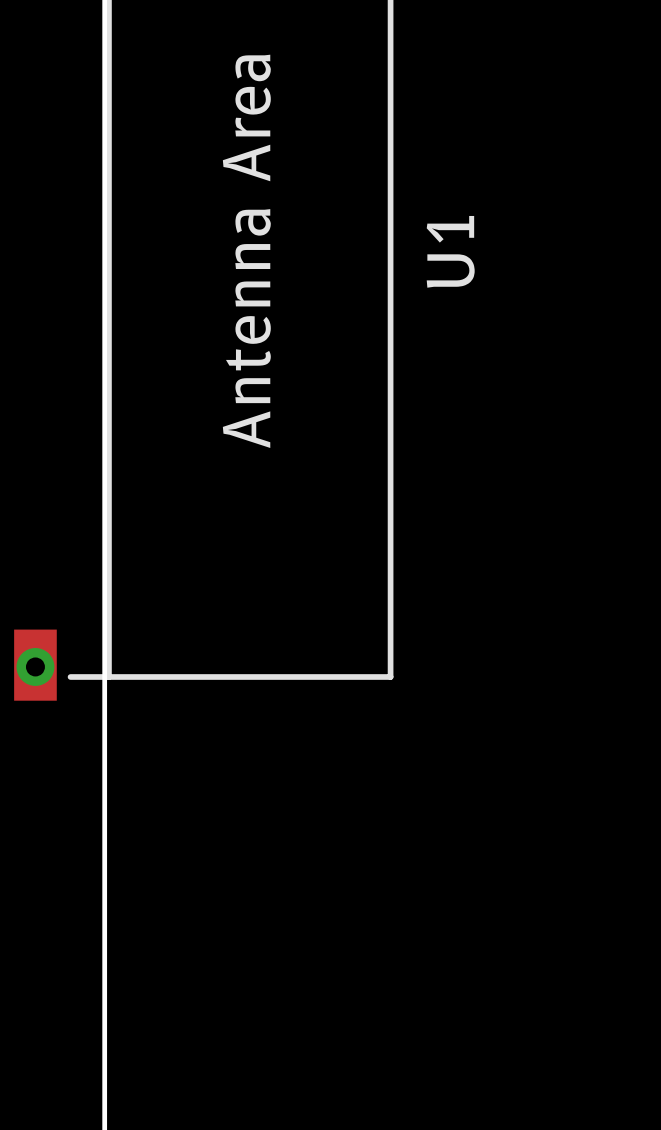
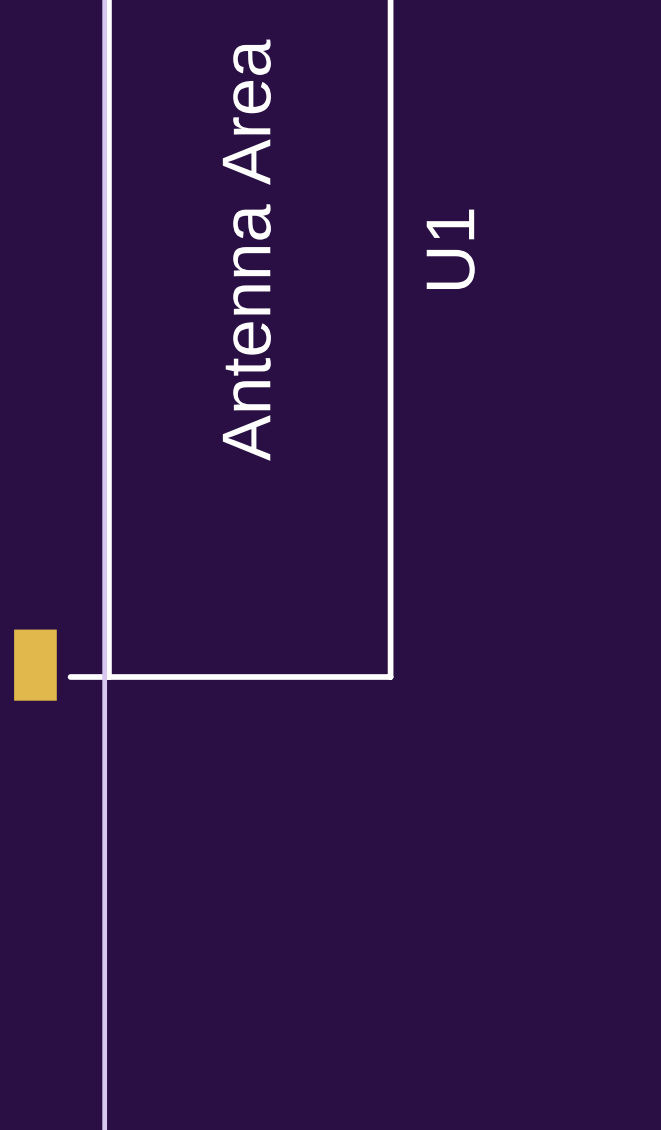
via: (35, 666) -> none

